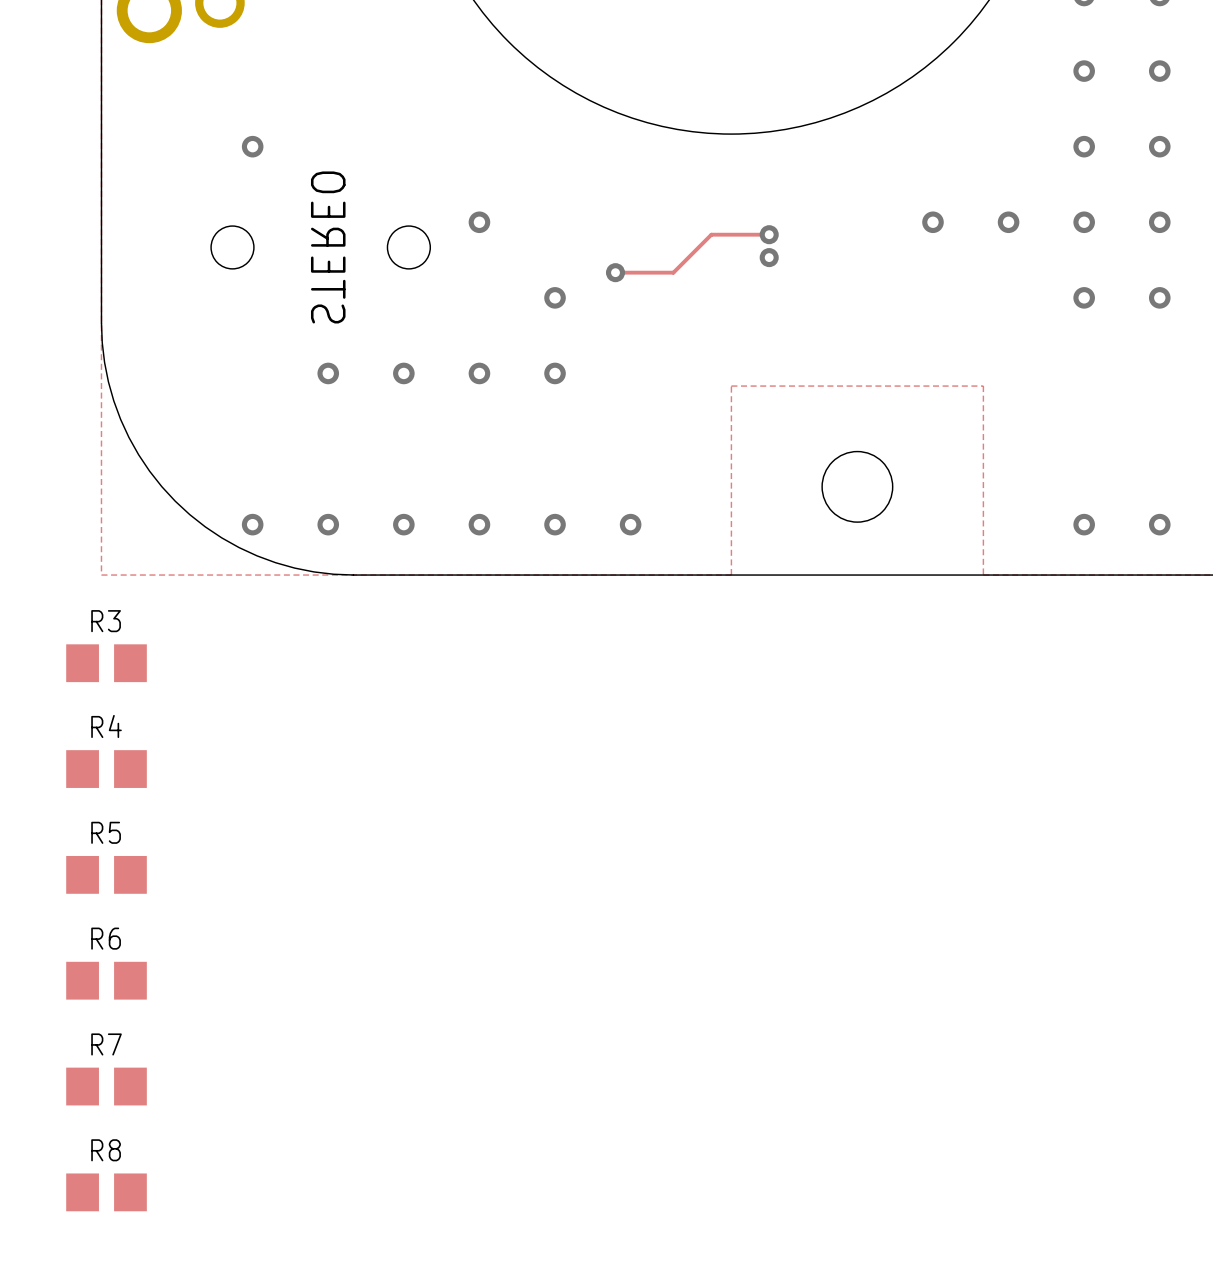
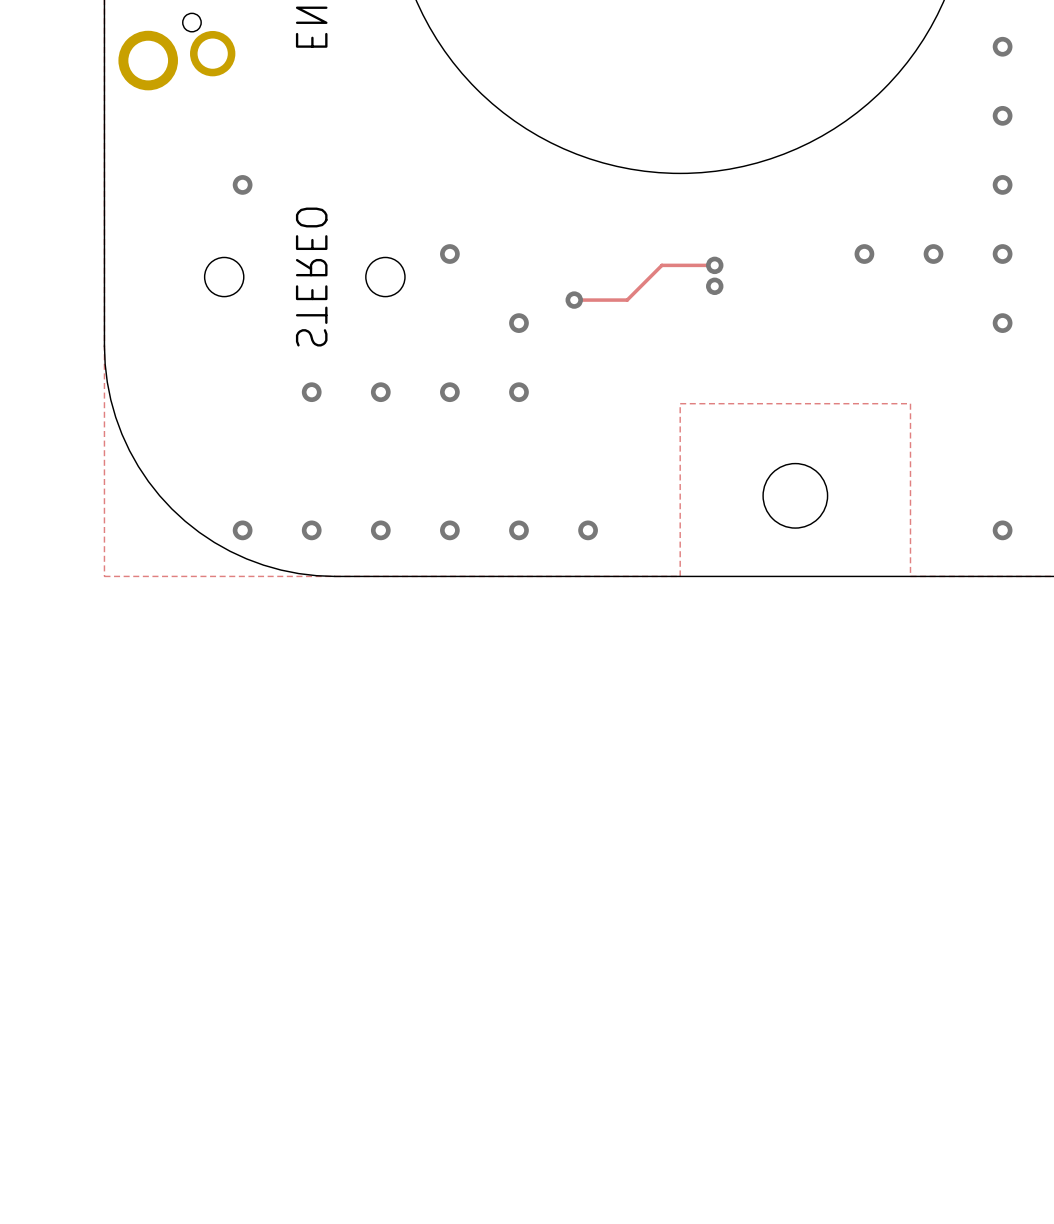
R3: (106, 663) -> none
R4: (106, 769) -> none
R5: (106, 874) -> none
R6: (106, 980) -> none
R7: (106, 1086) -> none
R8: (106, 1192) -> none

